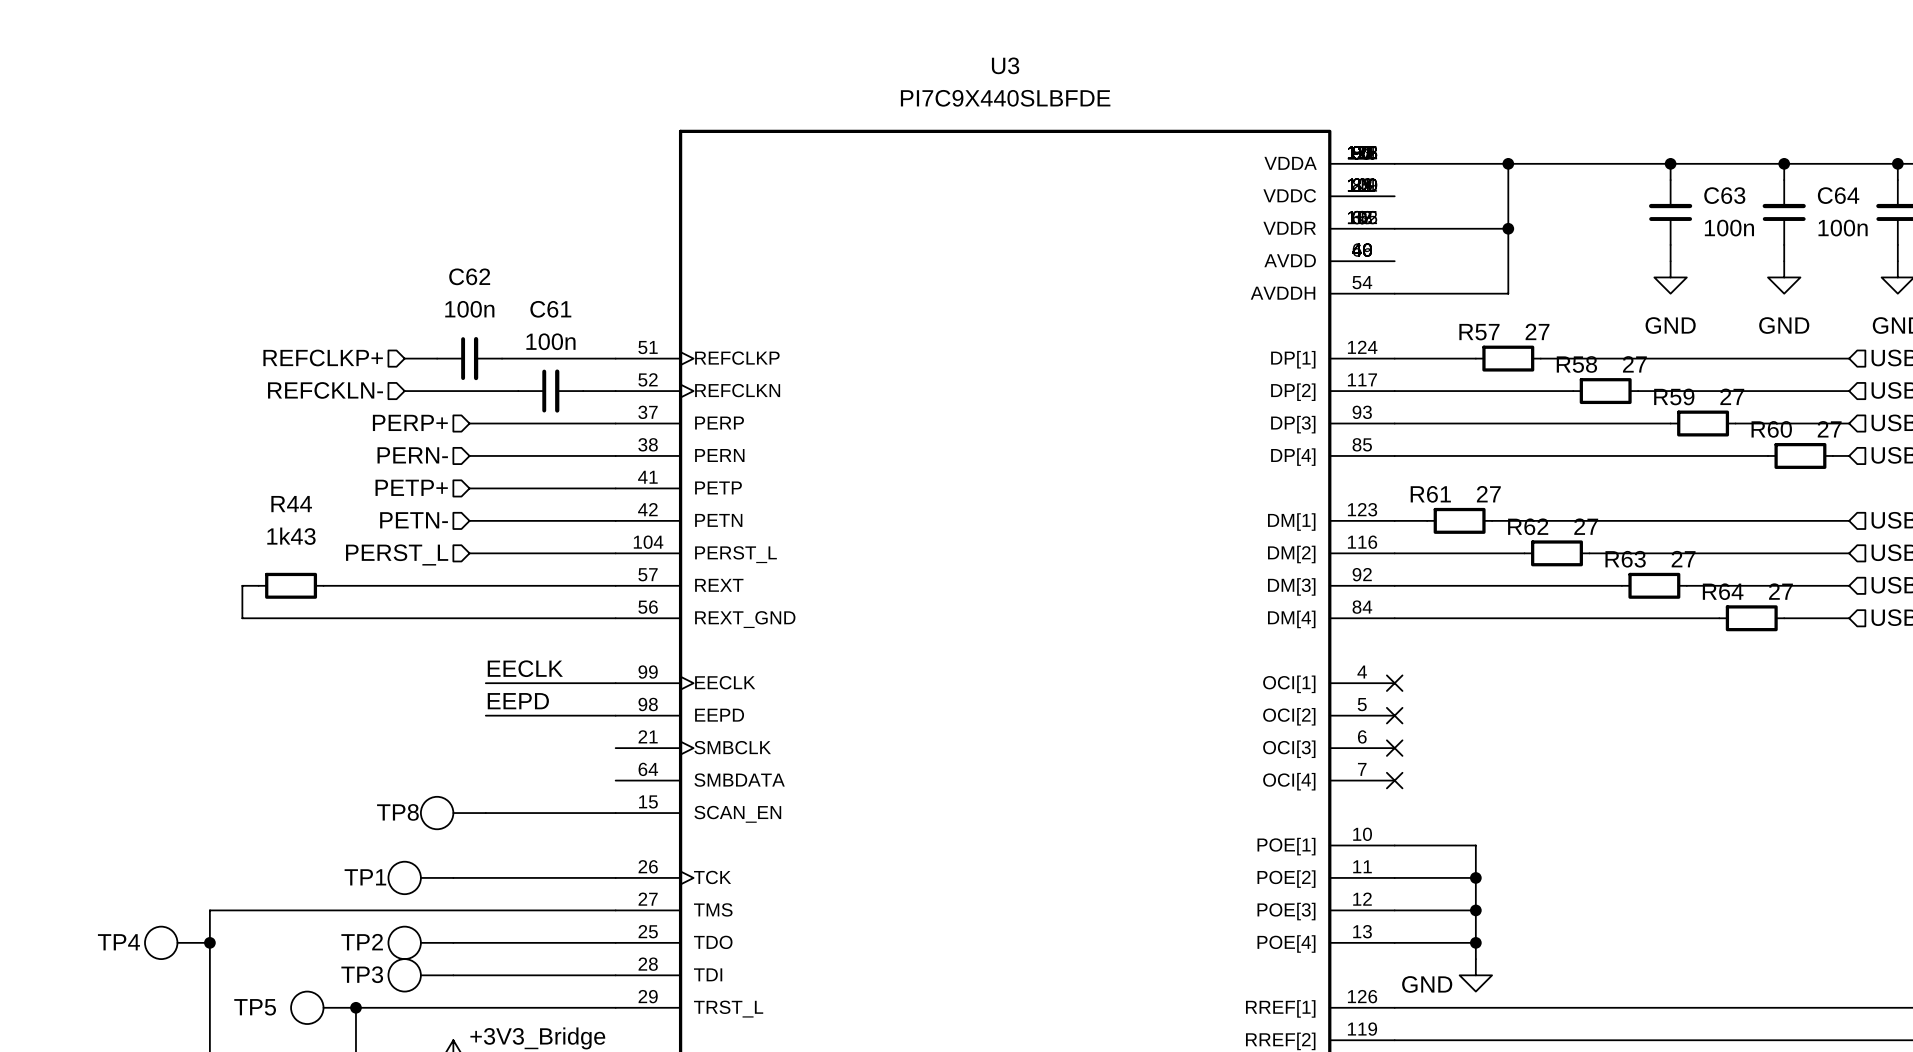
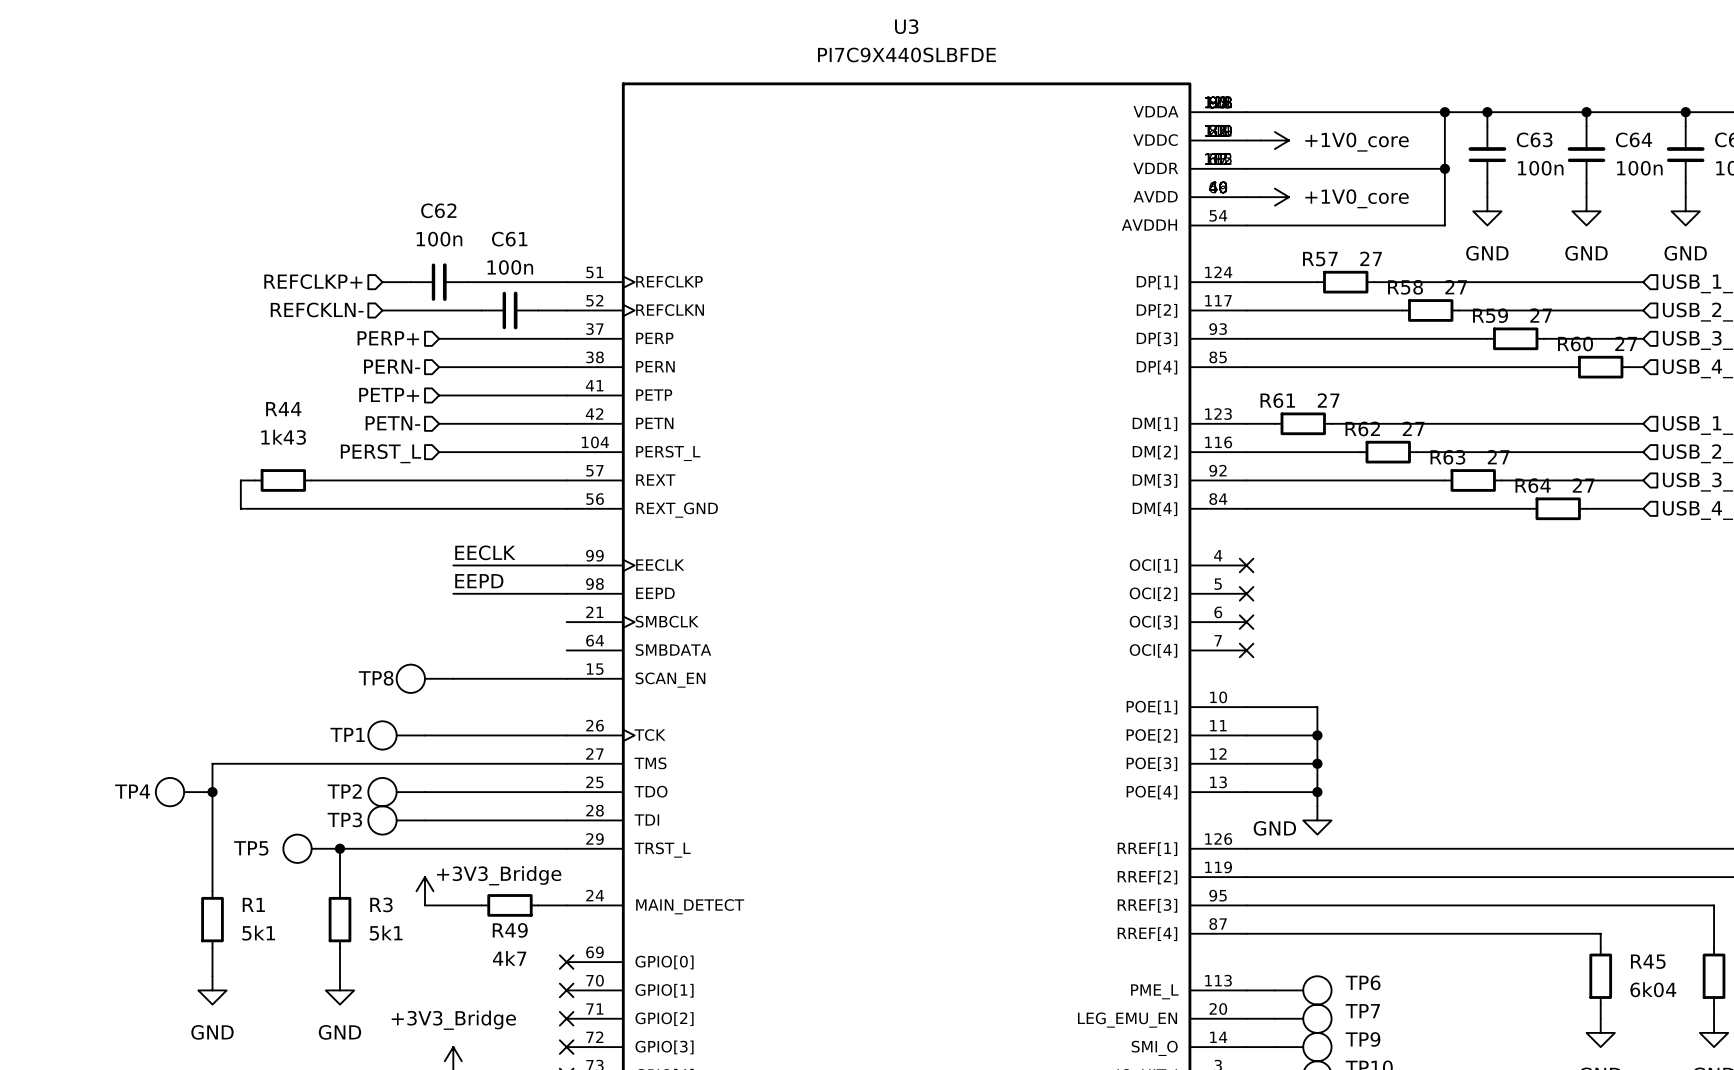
wire: (1508, 163) (1508, 293) -> (1444, 112) (1444, 225) (1345, 225)
junction: (1508, 163) -> none
junction: none -> (1444, 112)
wire: none -> (1246, 140) (1260, 140)
power symbol: none -> +1V0_core (1274, 140)
wire: none -> (1345, 168) (1444, 168)
junction: (1508, 228) -> none
junction: none -> (1444, 168)
wire: none -> (1246, 197) (1260, 197)
power symbol: none -> +1V0_core (1274, 197)

